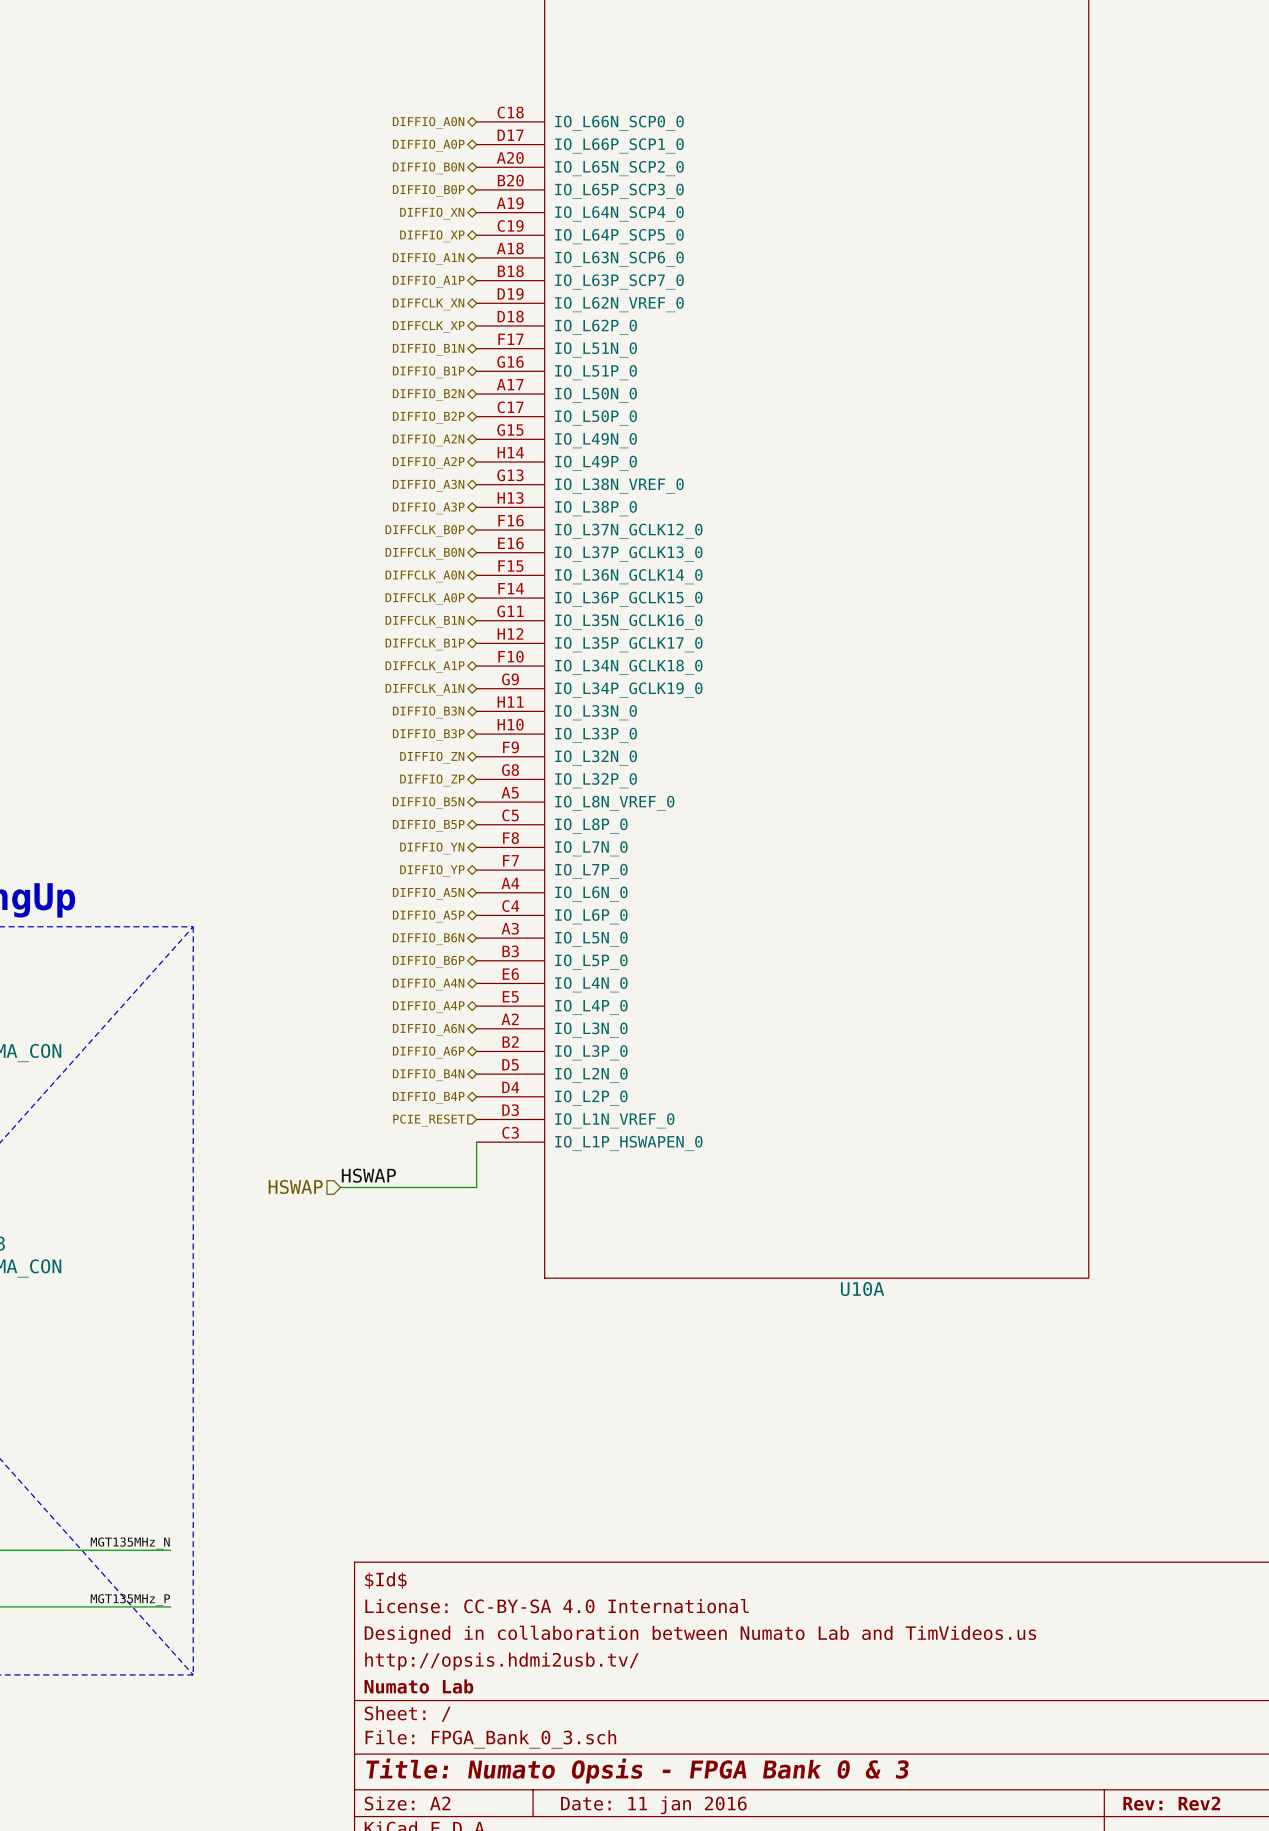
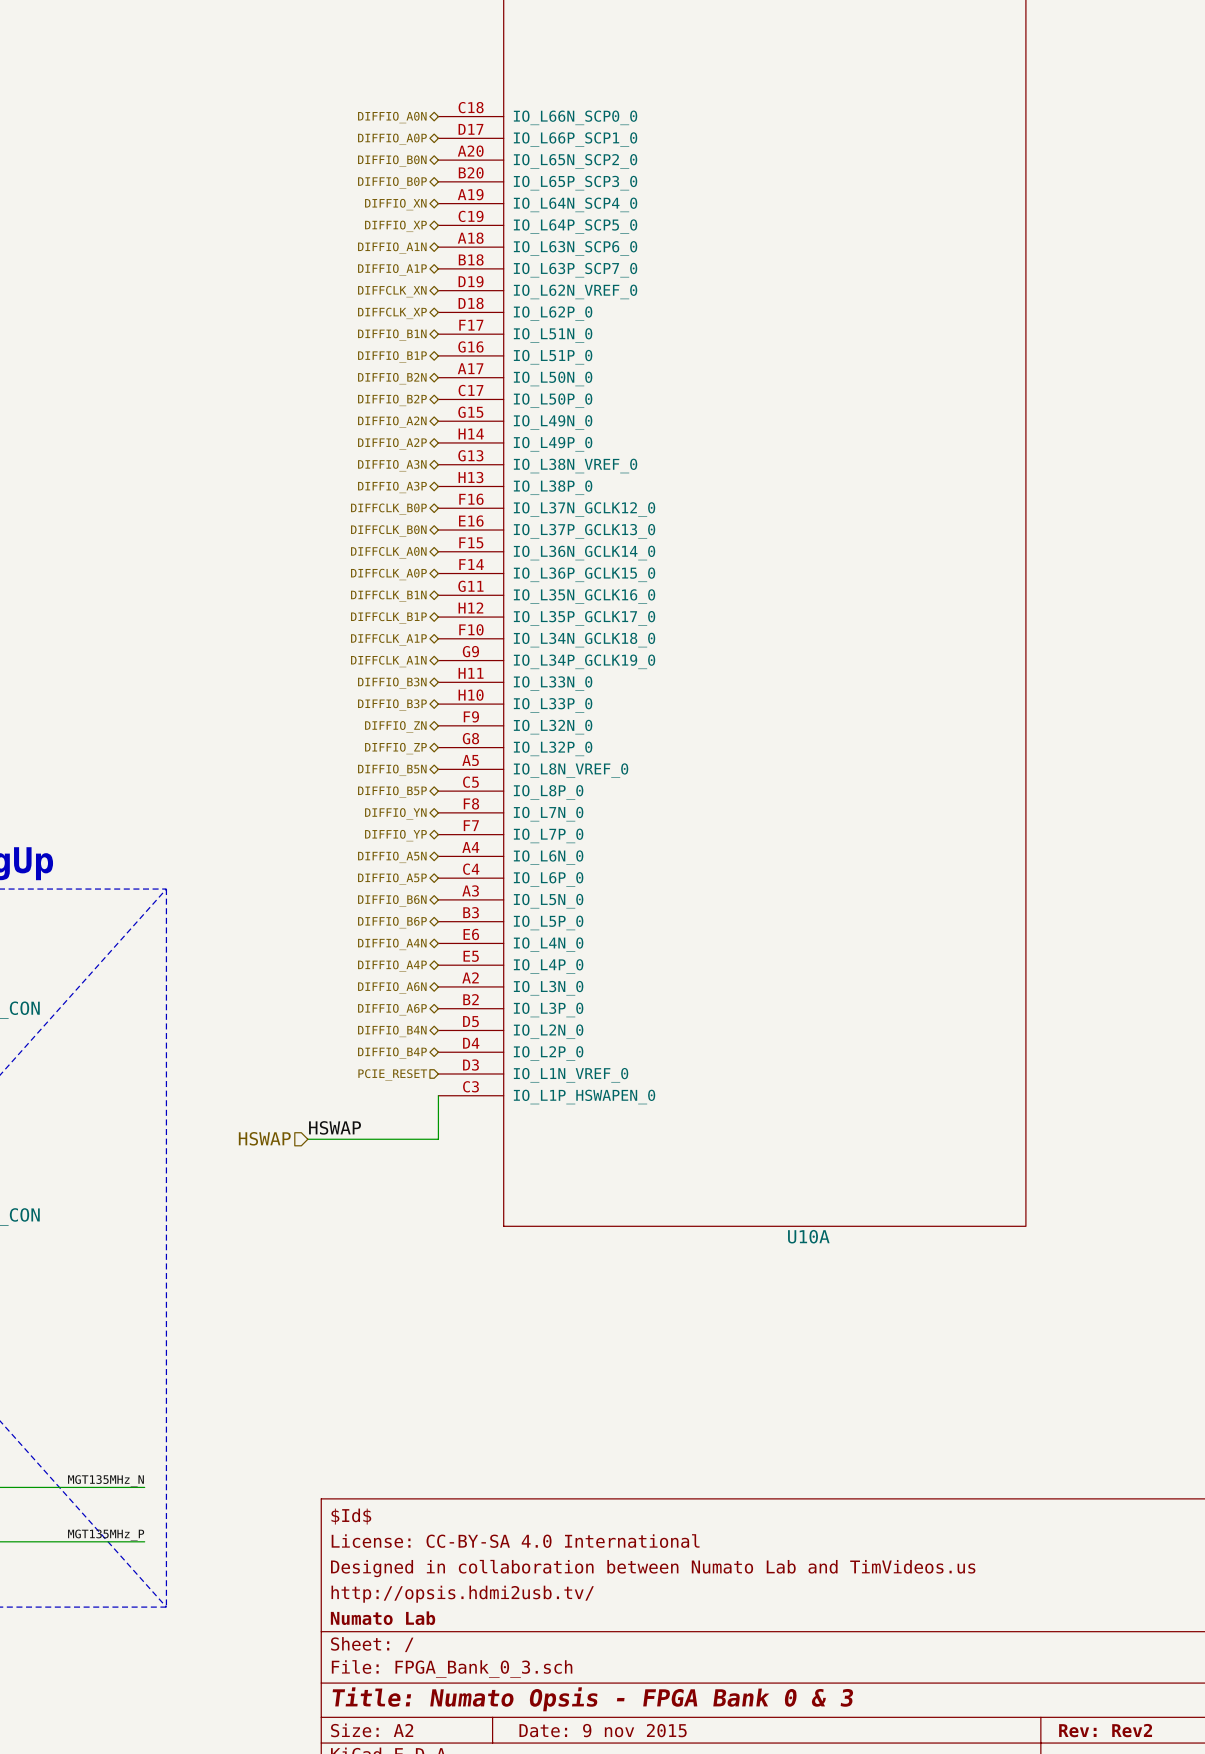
title block: Date: 11 jan 2016 (653, 1805) -> Date: 9 nov 2015 (603, 1730)

